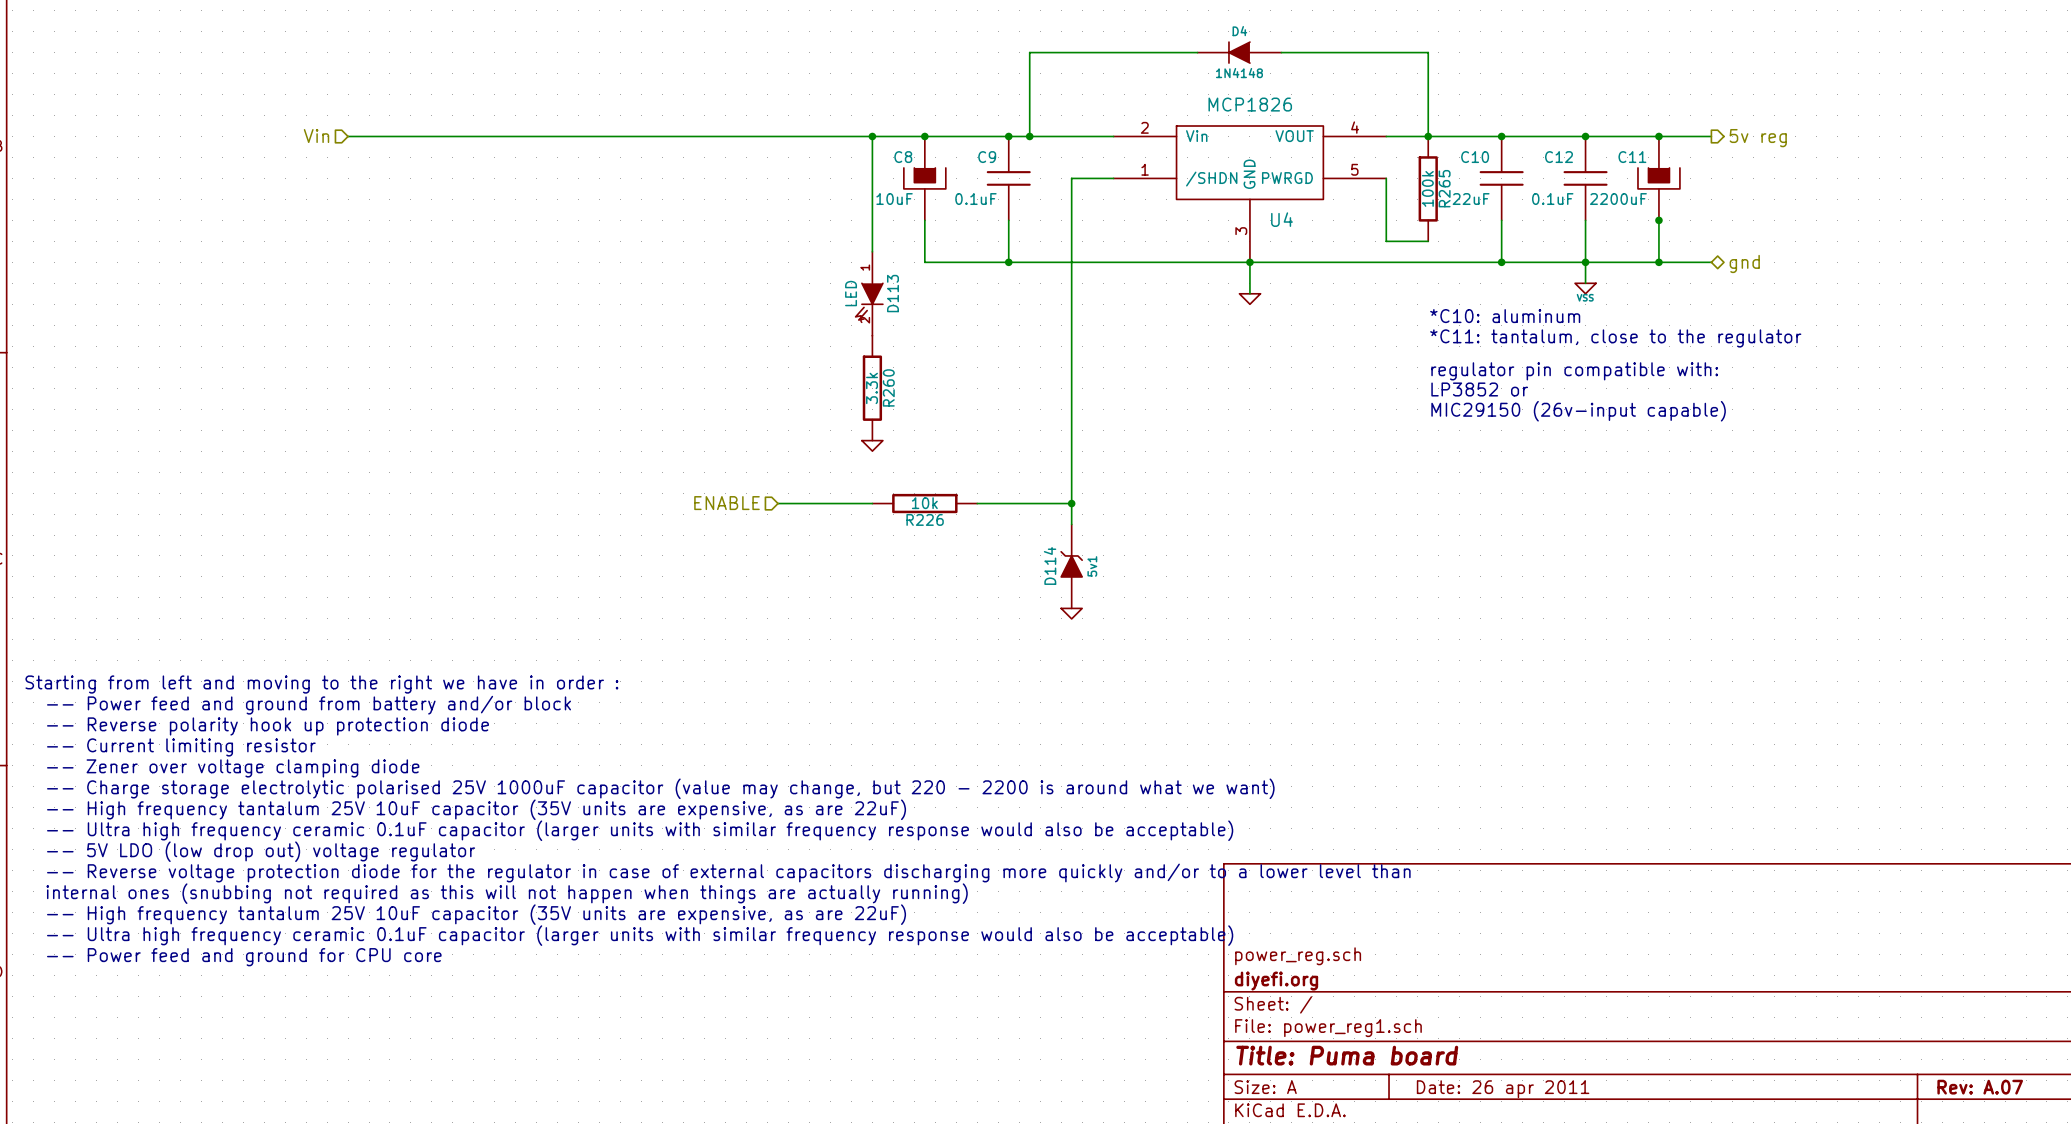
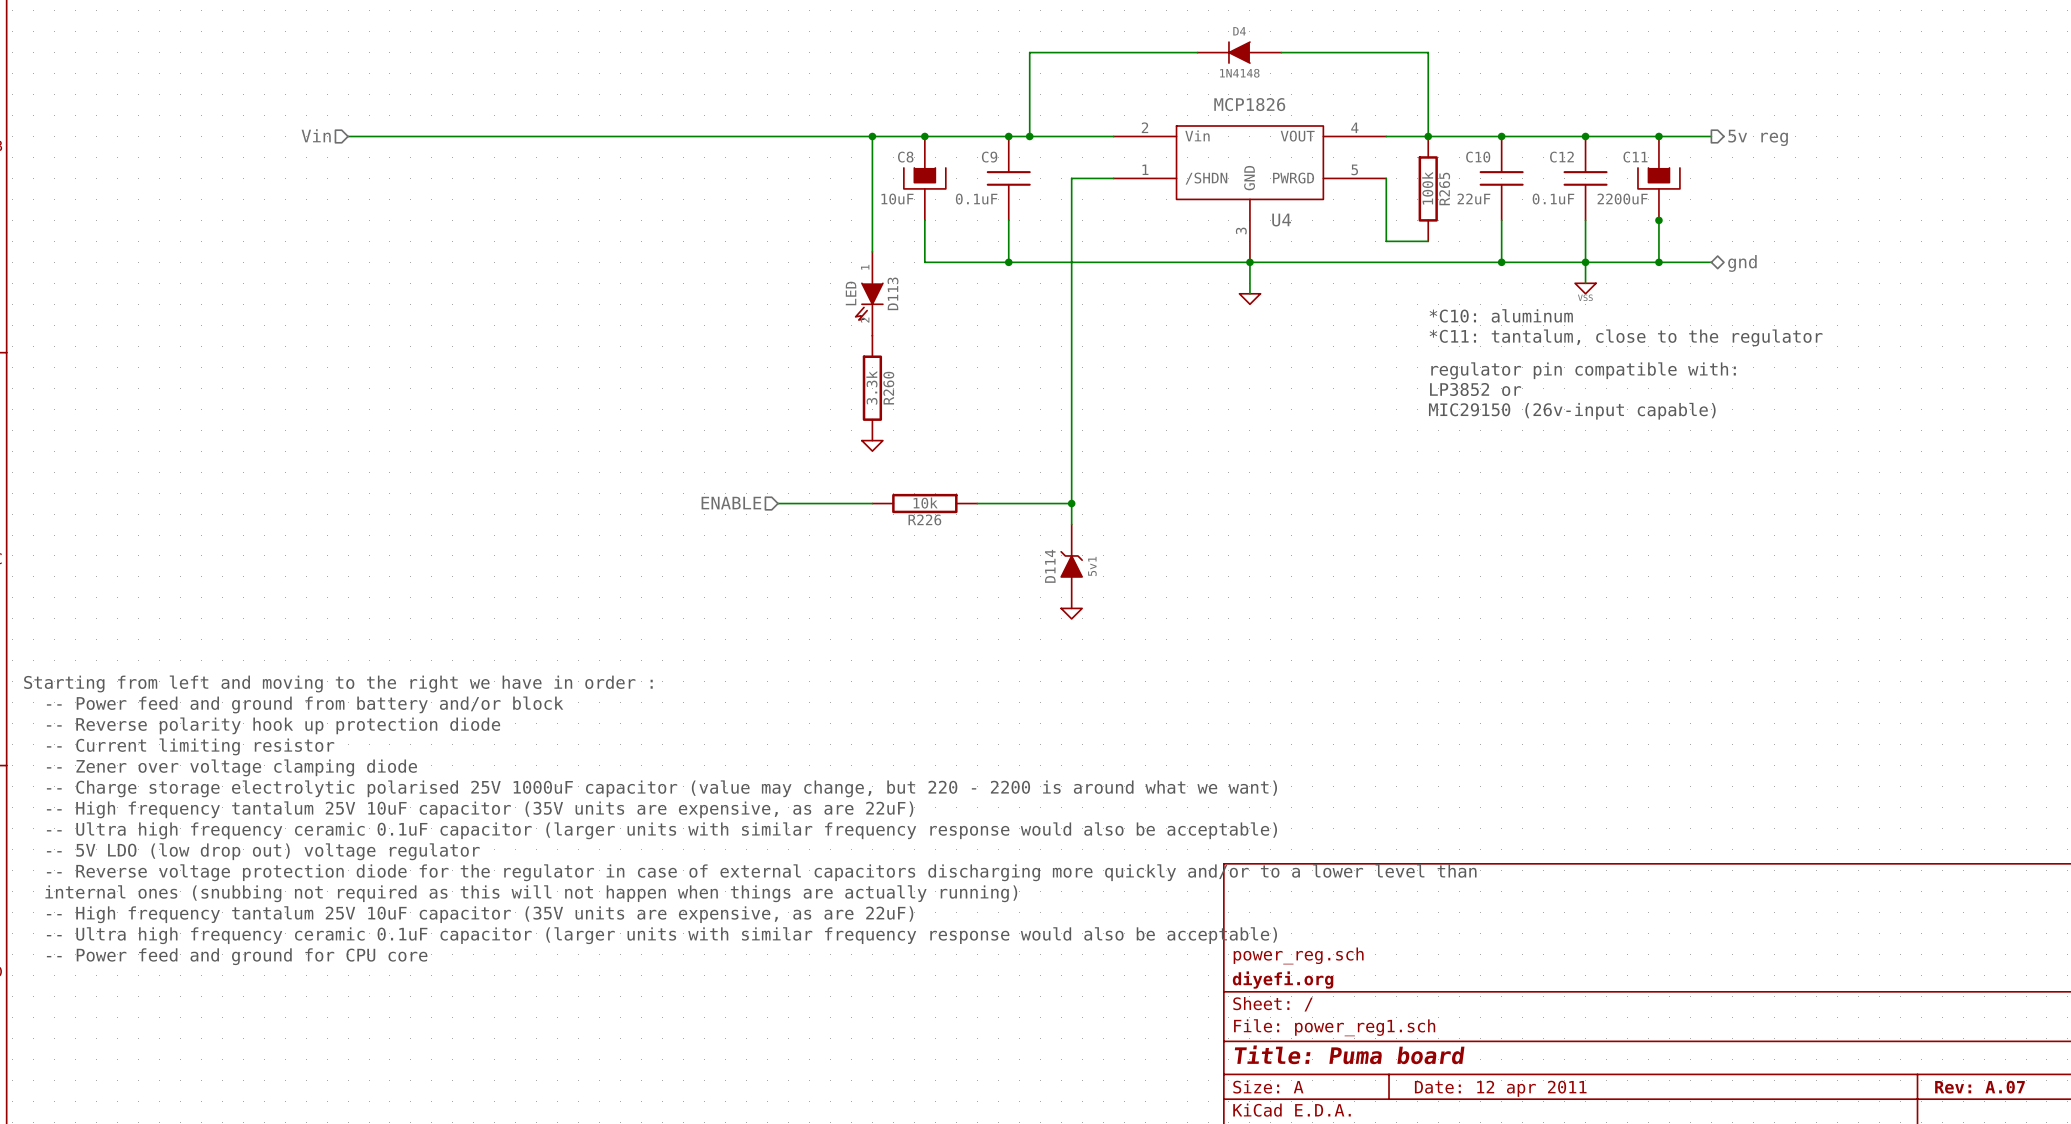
title block: Date: 26 apr 2011 (1503, 1089) -> Date: 12 apr 2011 (1500, 1088)

